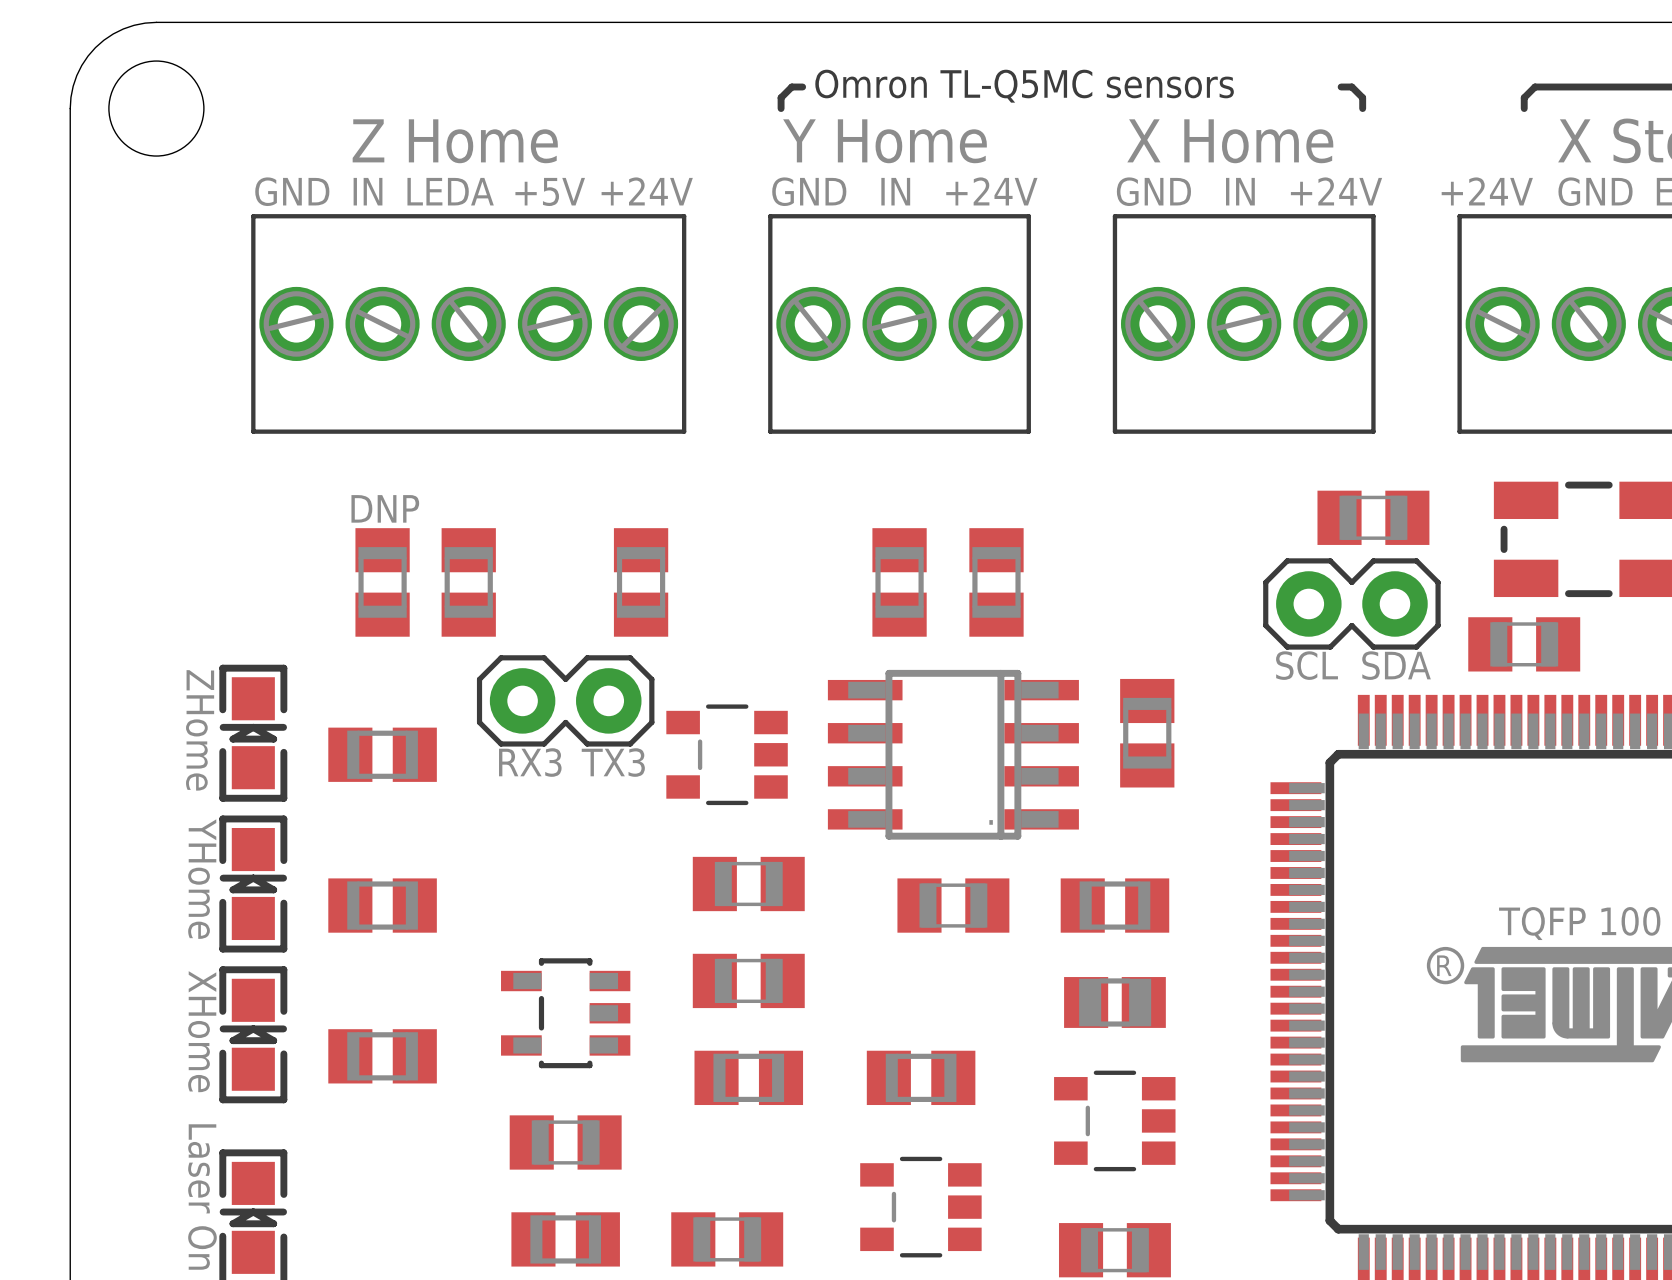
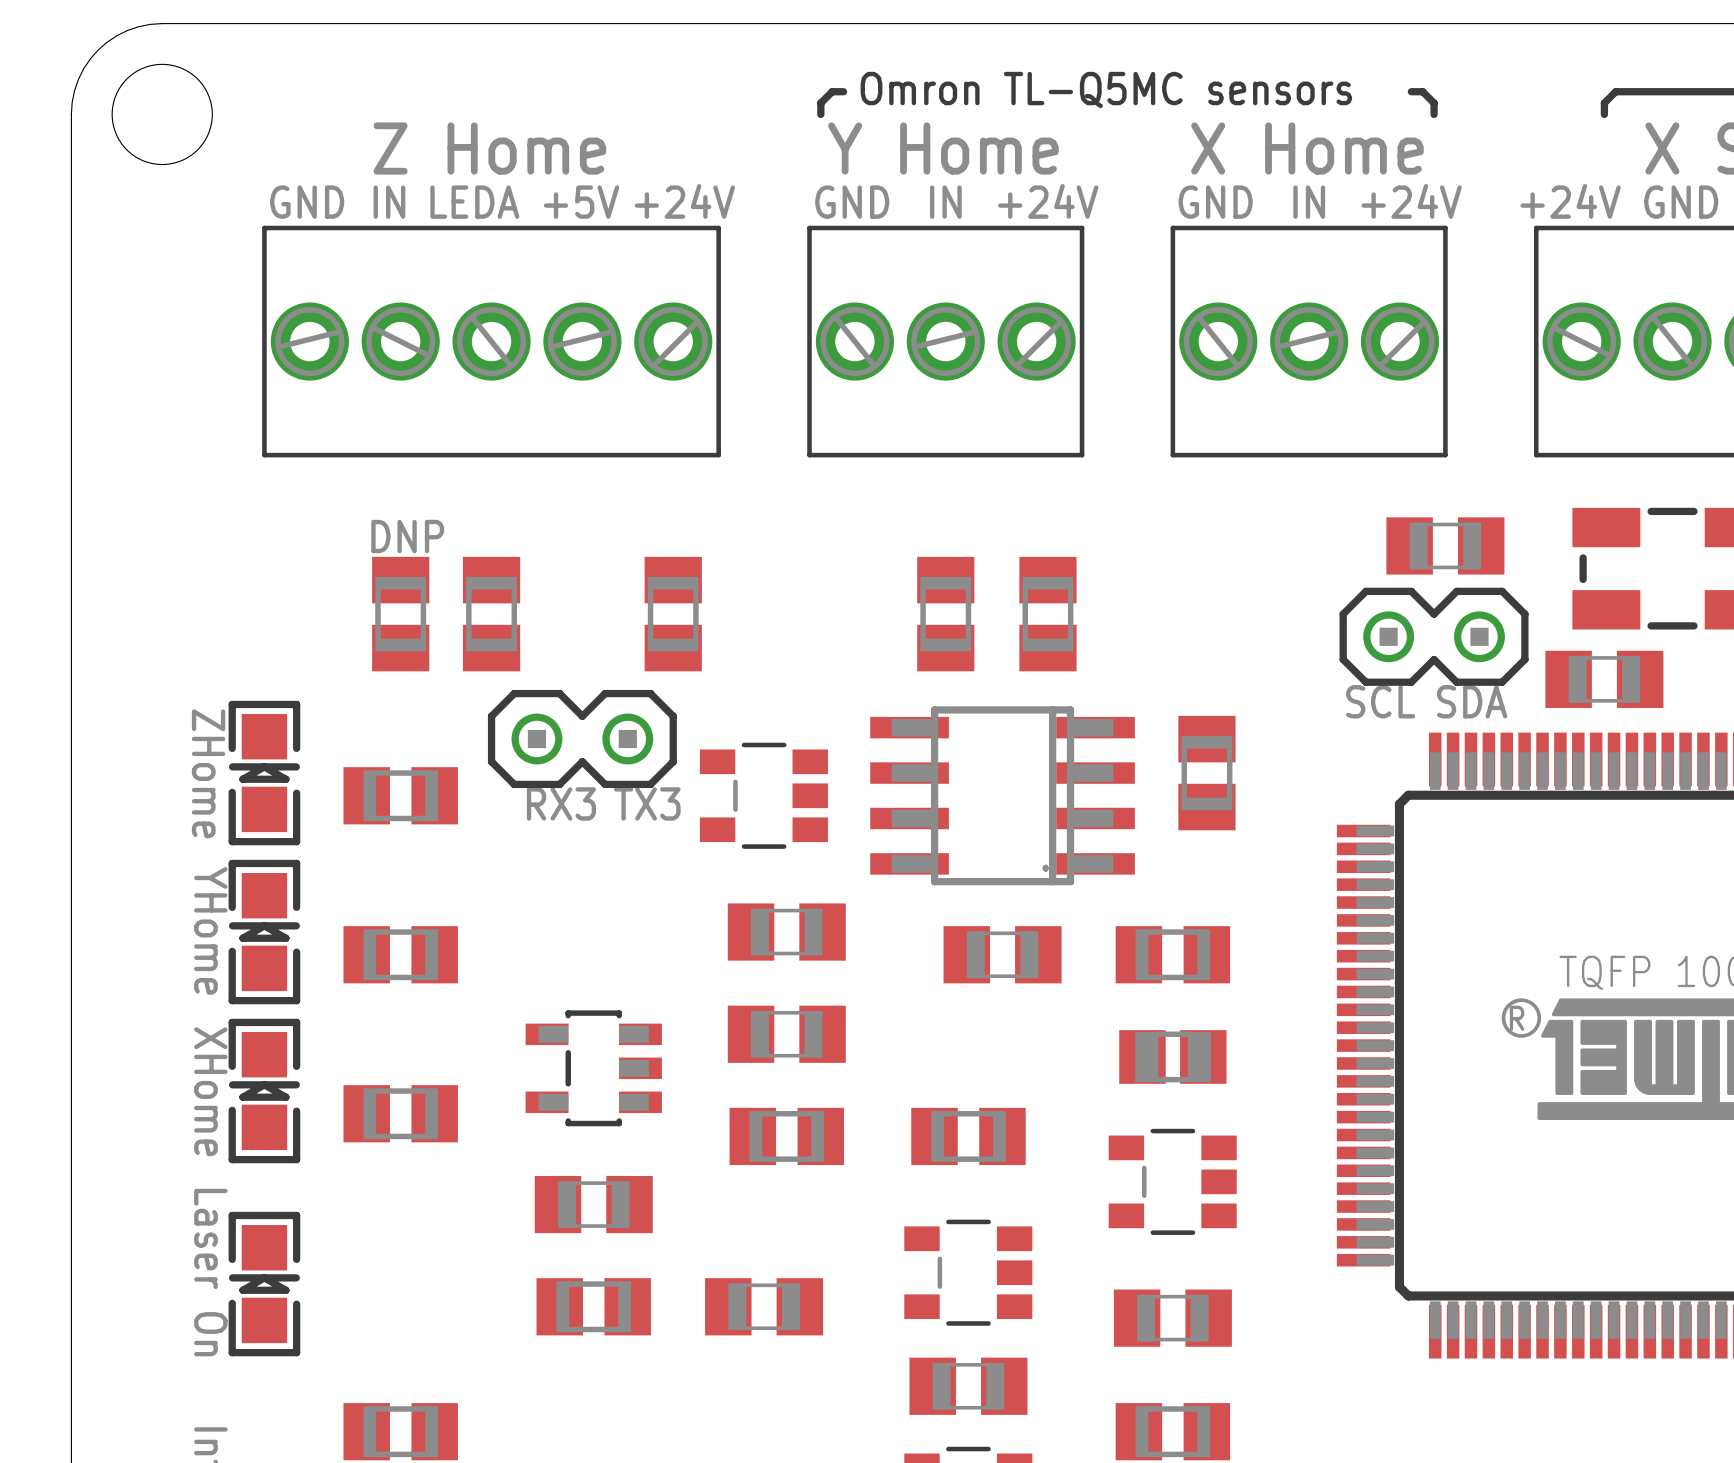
part footprint: [1263, 558, 1441, 650] -> [1339, 587, 1529, 686]
part footprint: [476, 655, 655, 747] -> [487, 689, 677, 789]

